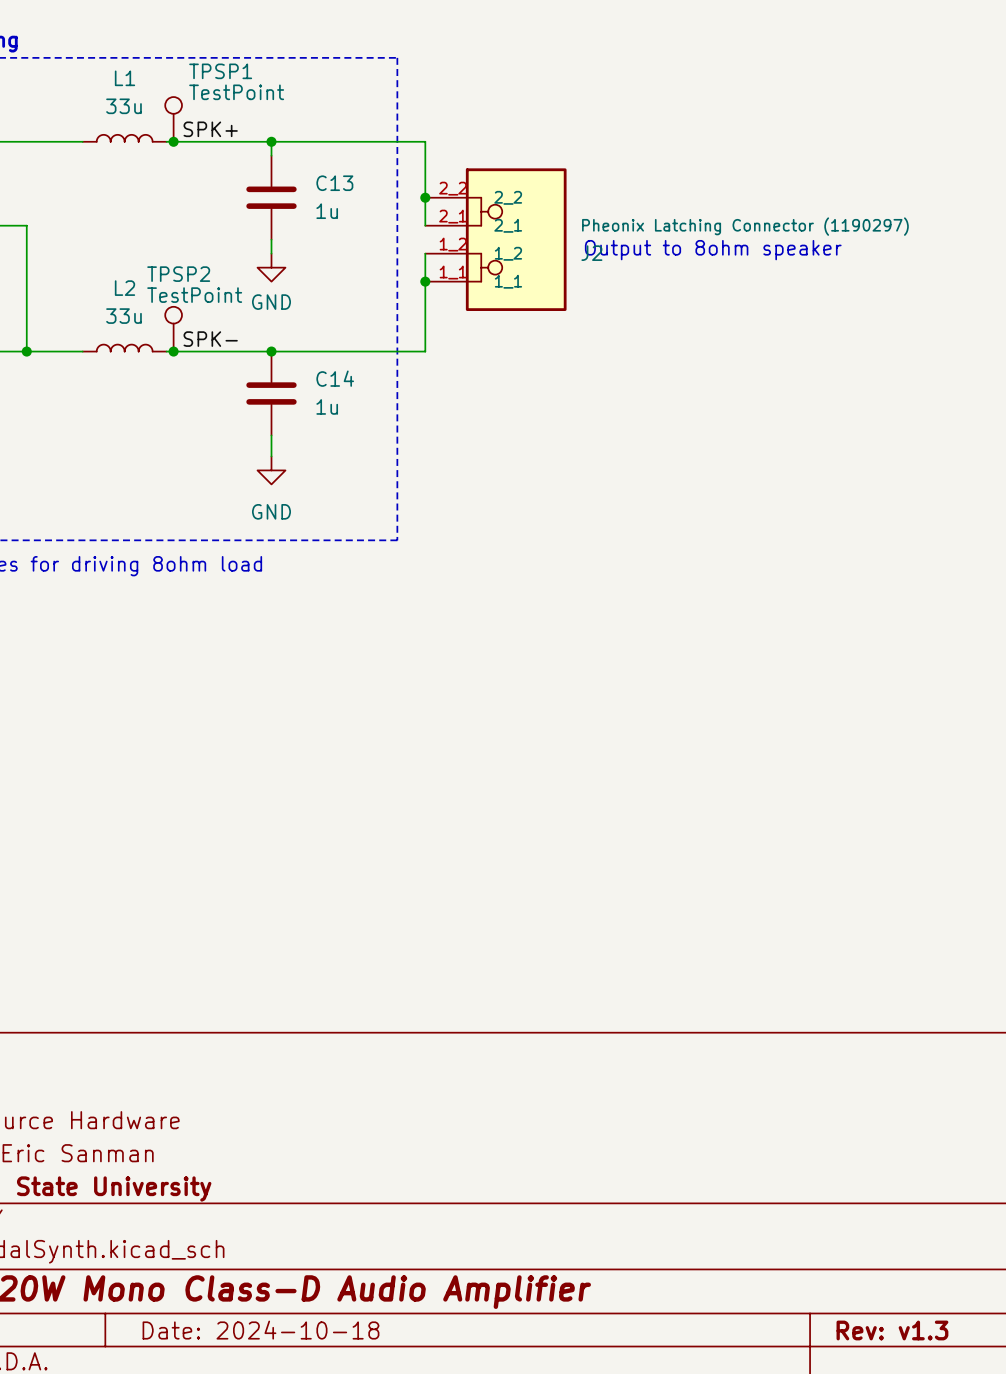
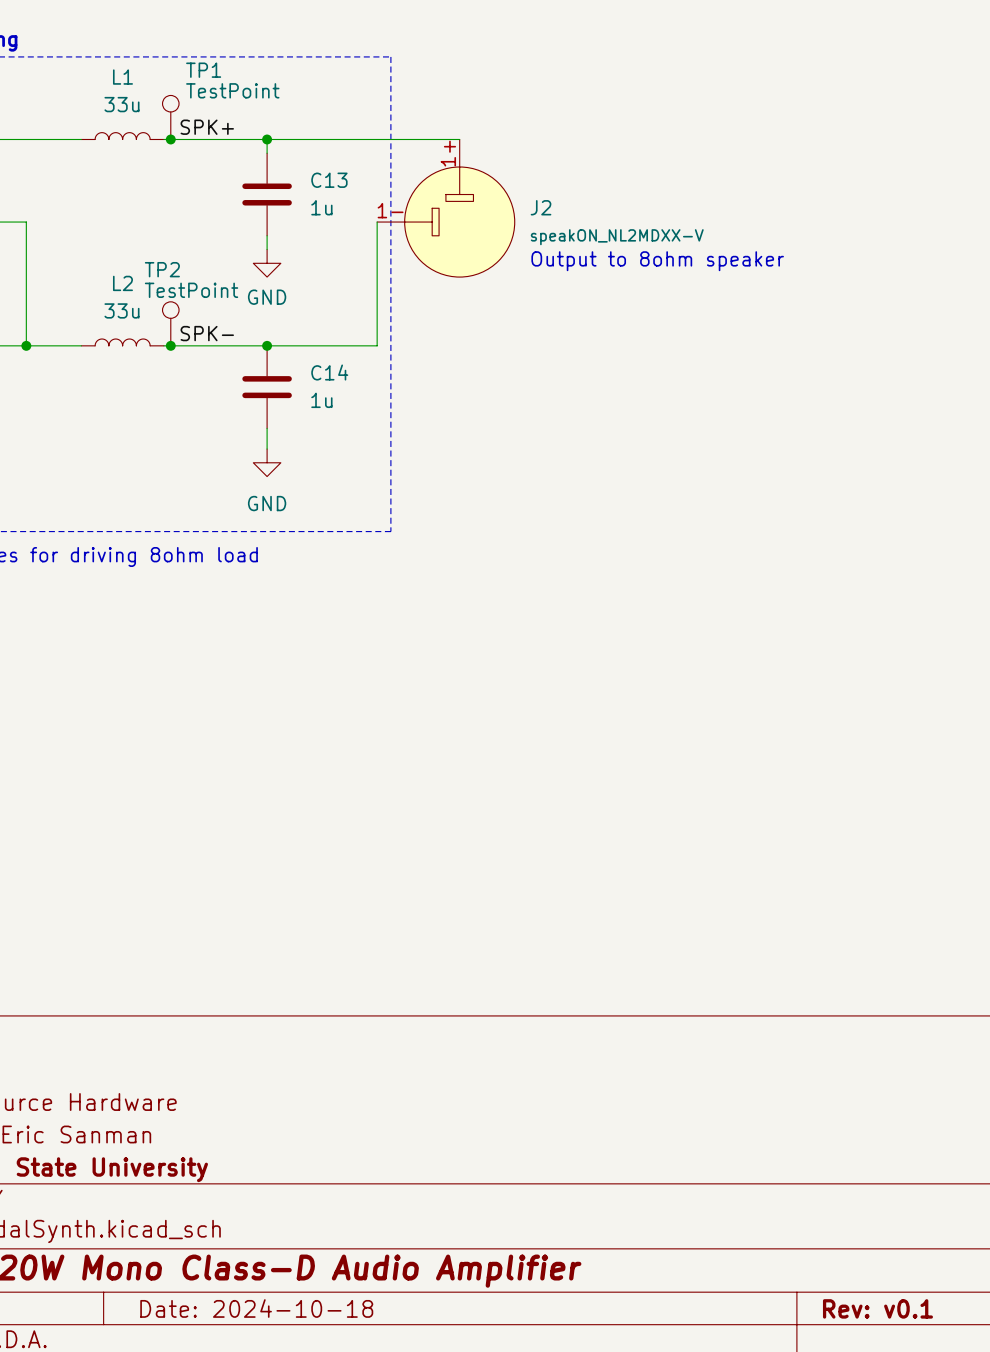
TPSP1 name: TPSP1 (220, 71) -> TP1 (203, 70)
wire: (425, 141) (425, 225) -> (418, 139) (459, 139)
J2 symbol: [425, 168, 567, 311] -> [377, 139, 515, 278]
junction: (425, 197) -> none
J2 value: Pheonix Latching Connector (1190297) (745, 226) -> speakON_NL2MDXX-V (617, 237)
text position: Output to 8ohm speaker (713, 250) -> Output to 8ohm speaker (657, 261)
wire: (425, 253) (425, 351) (383, 351) -> (377, 222) (377, 345)
TPSP2 name: TPSP2 (178, 274) -> TP2 (162, 269)
junction: (425, 281) -> none
title block: Rev: v1.3 (892, 1330) -> Rev: v0.1 (877, 1308)

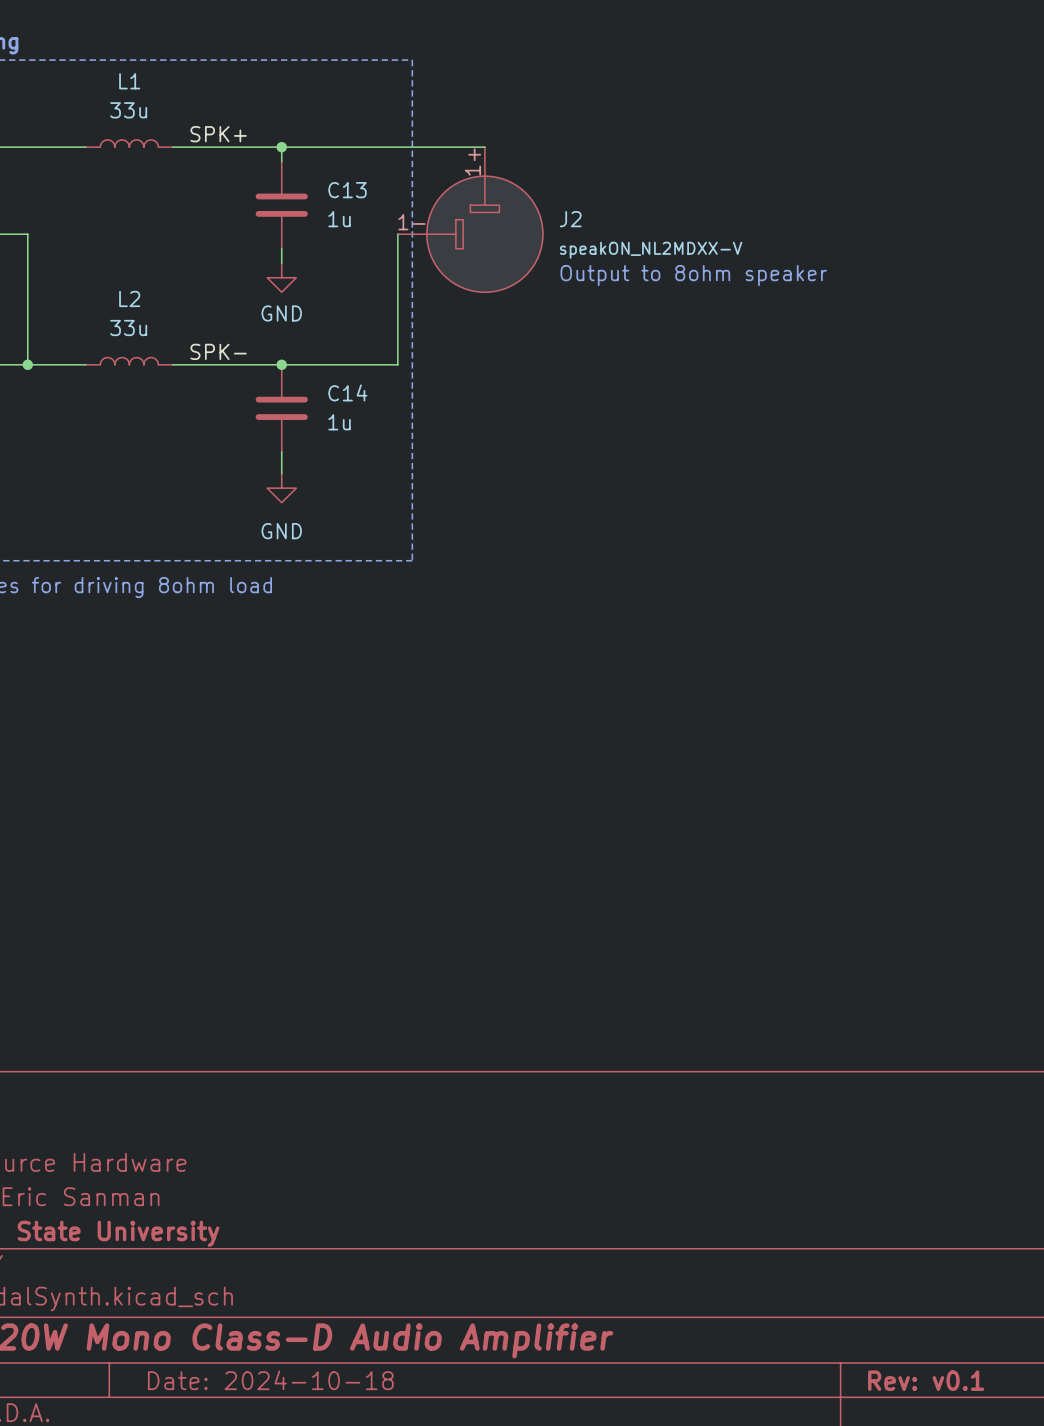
TP1: TestPoint (170, 117) -> none
junction: (170, 139) -> none
TP2: TestPoint (170, 323) -> none
junction: (170, 345) -> none

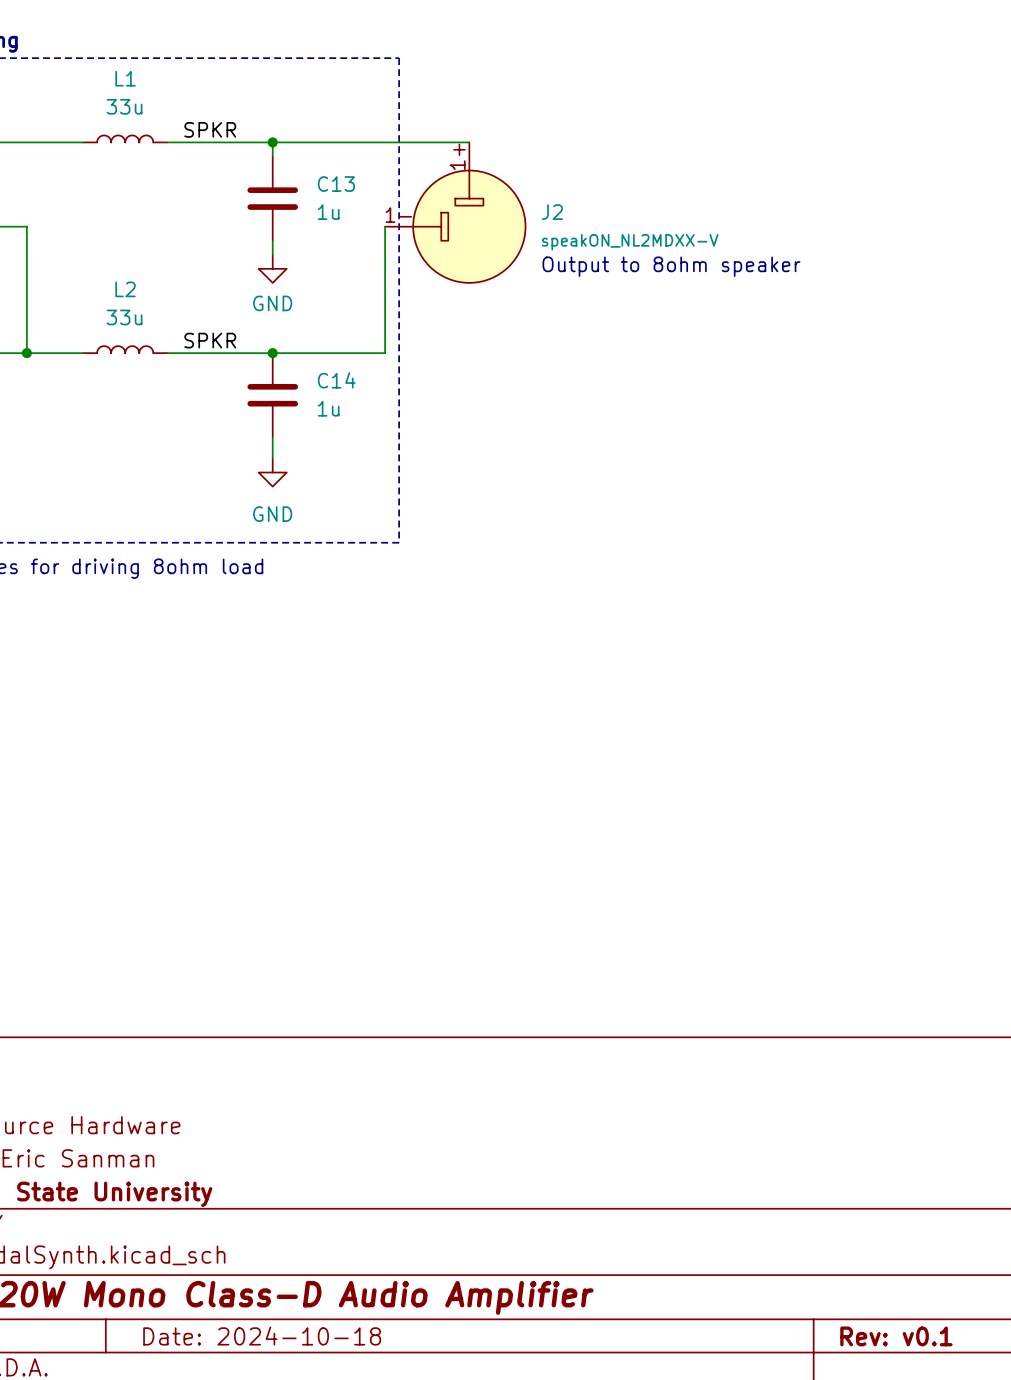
label: SPK+ (218, 134) -> SPKR (210, 129)
label: SPK- (218, 351) -> SPKR (210, 340)

